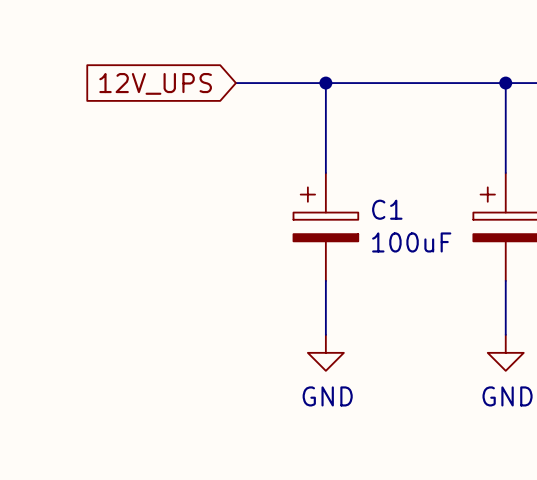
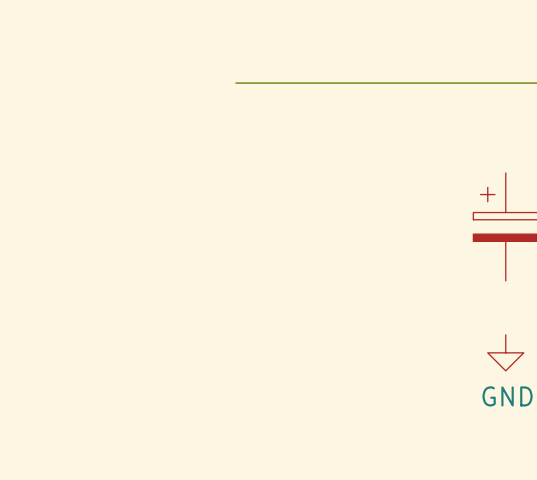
global label: 12V_UPS (155, 83) -> none
wire: (325, 83) (325, 172) -> none
junction: (325, 83) -> none
wire: (505, 83) (505, 172) -> none
junction: (505, 83) -> none
C1: 100uF (325, 226) -> none
wire: (325, 280) (325, 334) -> none
wire: (505, 280) (505, 334) -> none
power symbol: GND (325, 352) -> none

